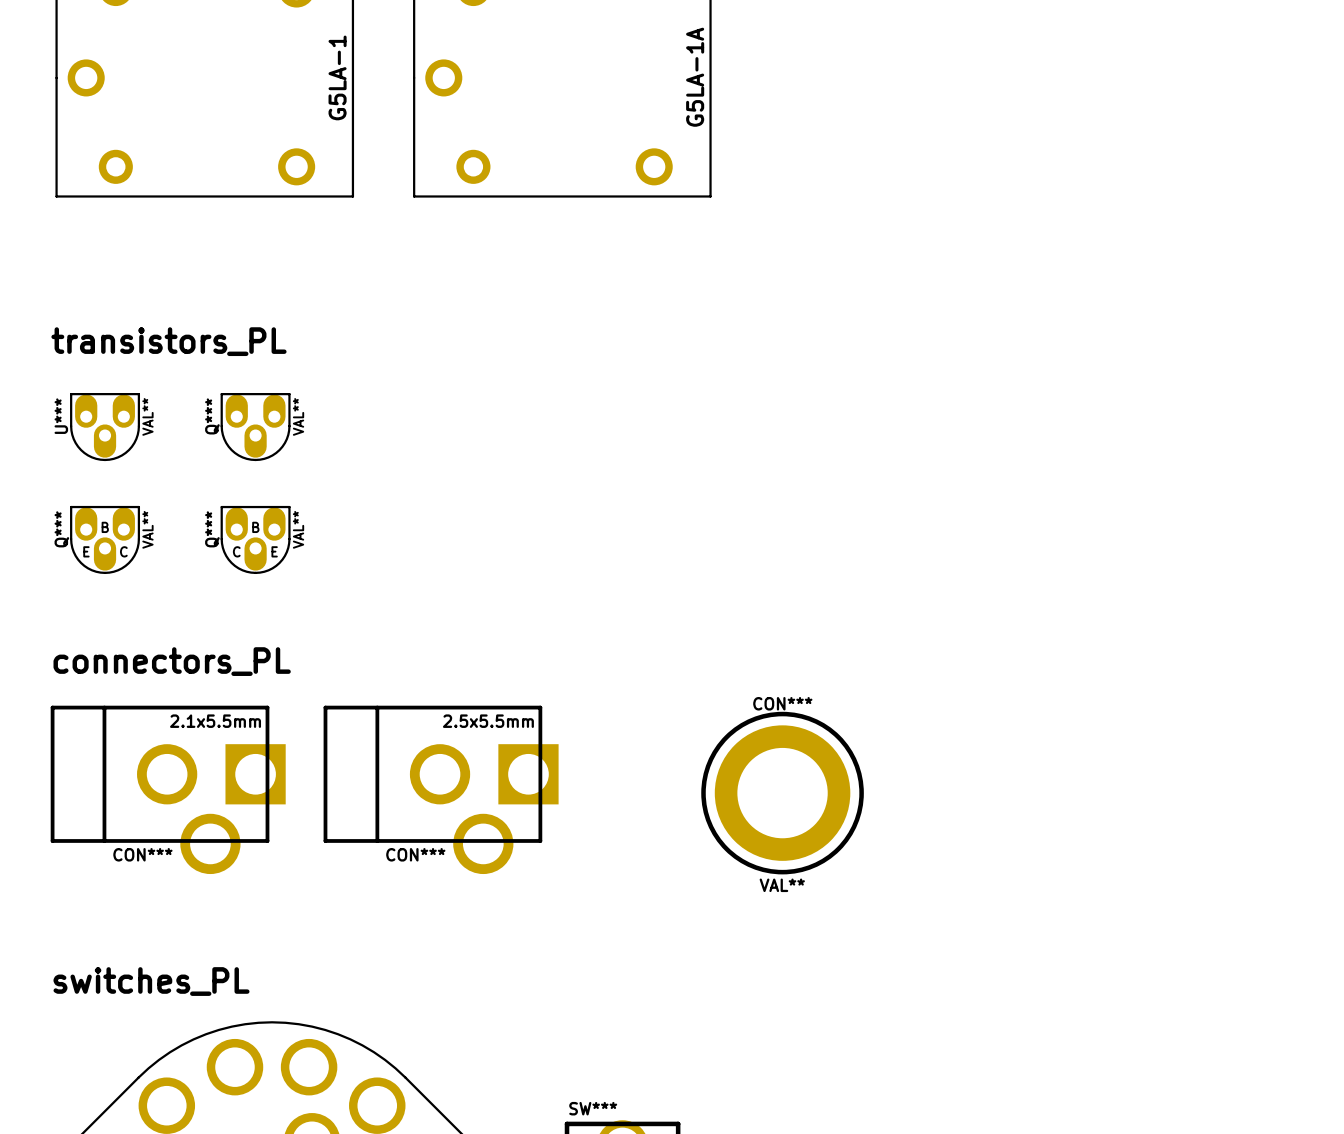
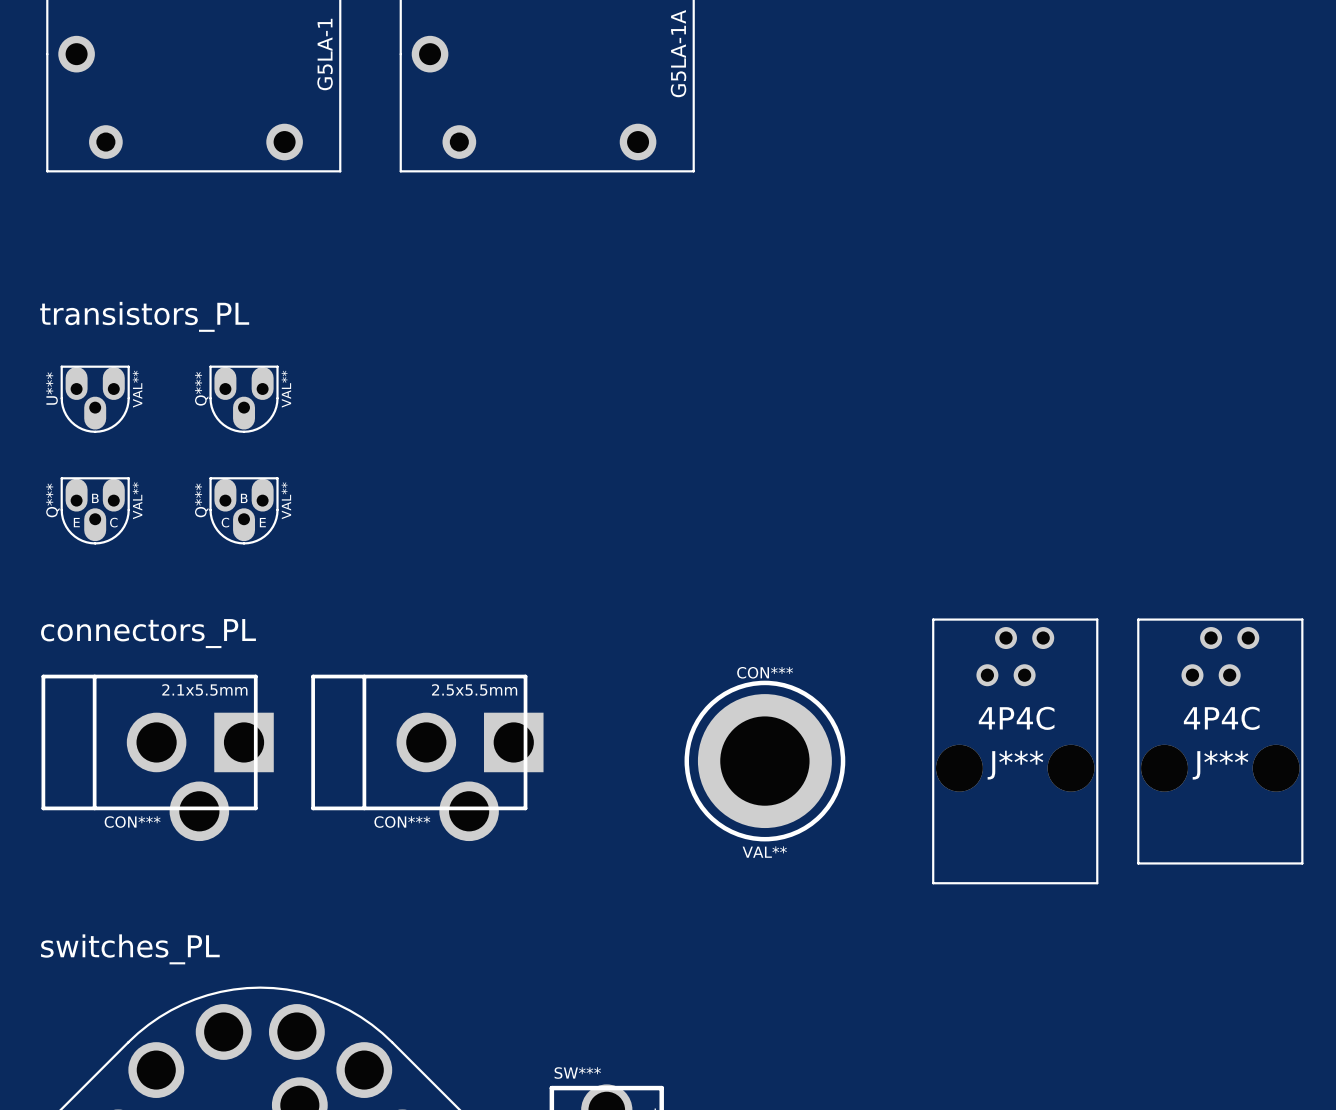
J***: none -> 4P4C (1220, 741)
J***: none -> 4P4C (1015, 751)

